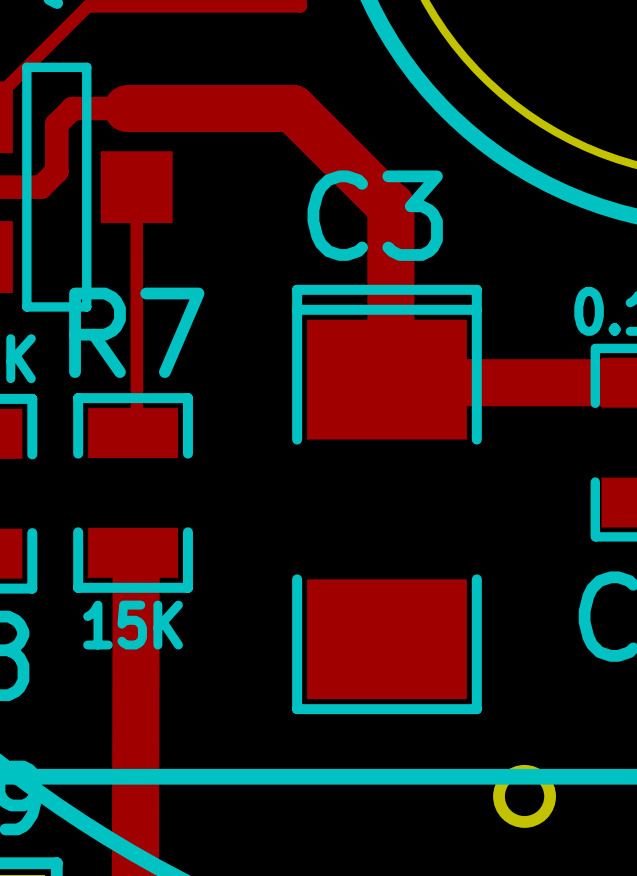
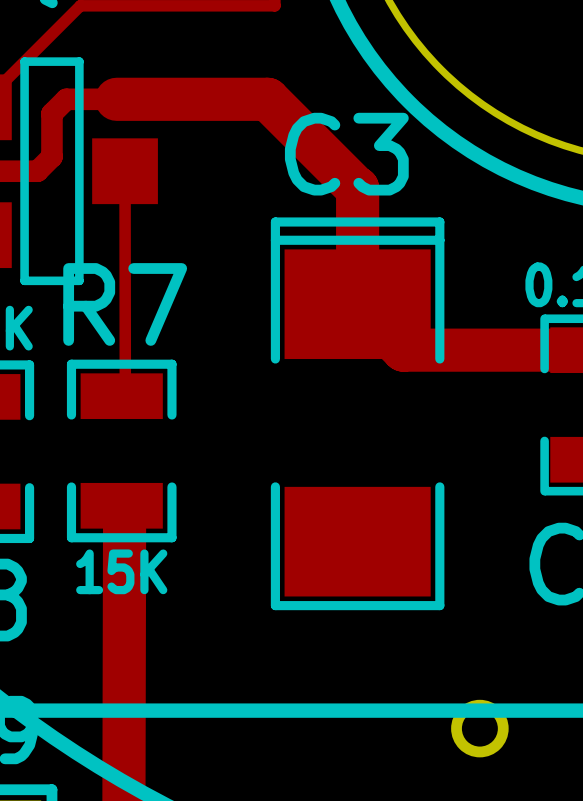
C3 position: (386, 499) -> (357, 413)

